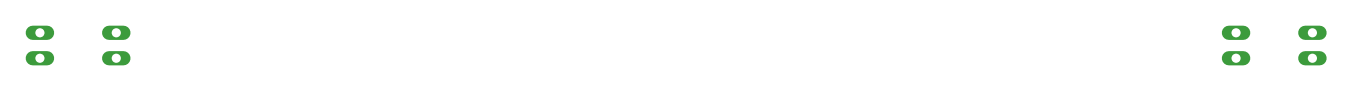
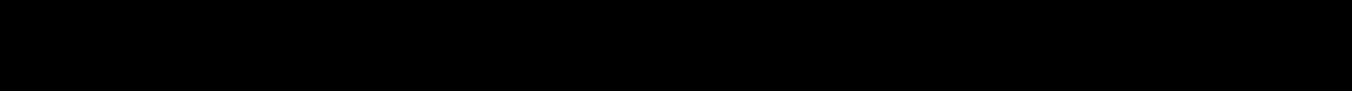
part: (39, 45) -> none
part: (116, 45) -> none
part: (1236, 45) -> none
part: (1312, 45) -> none

